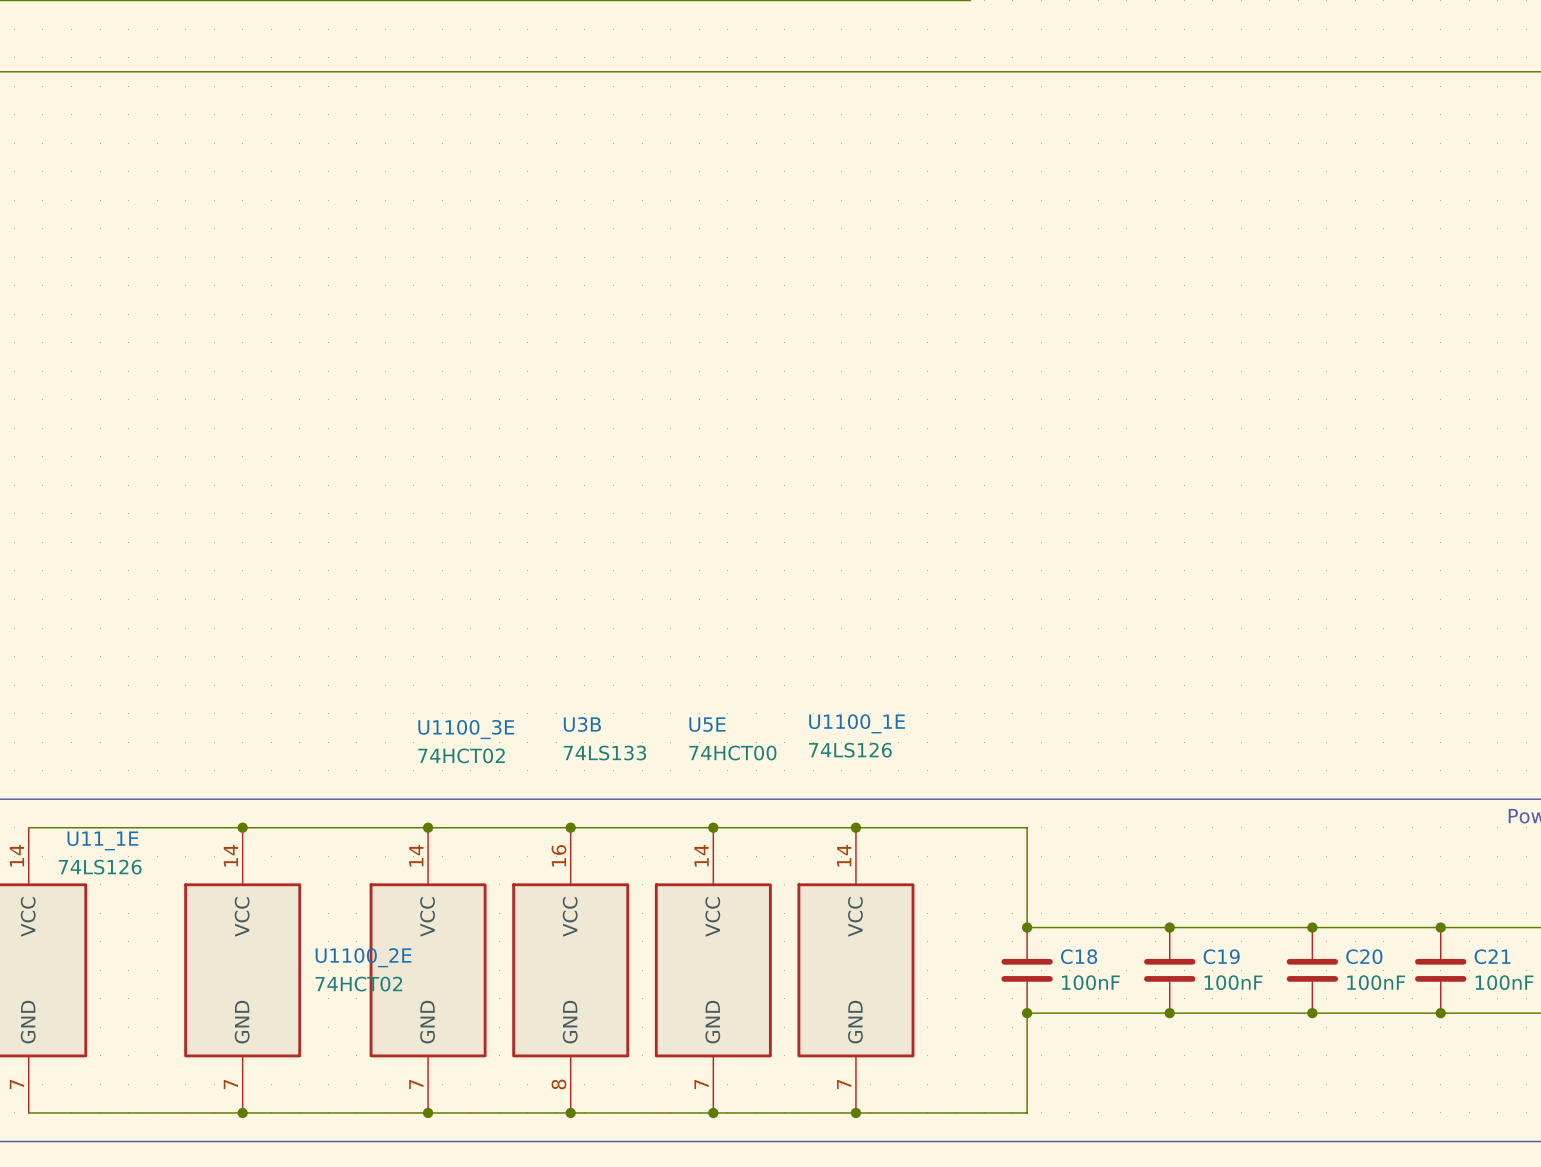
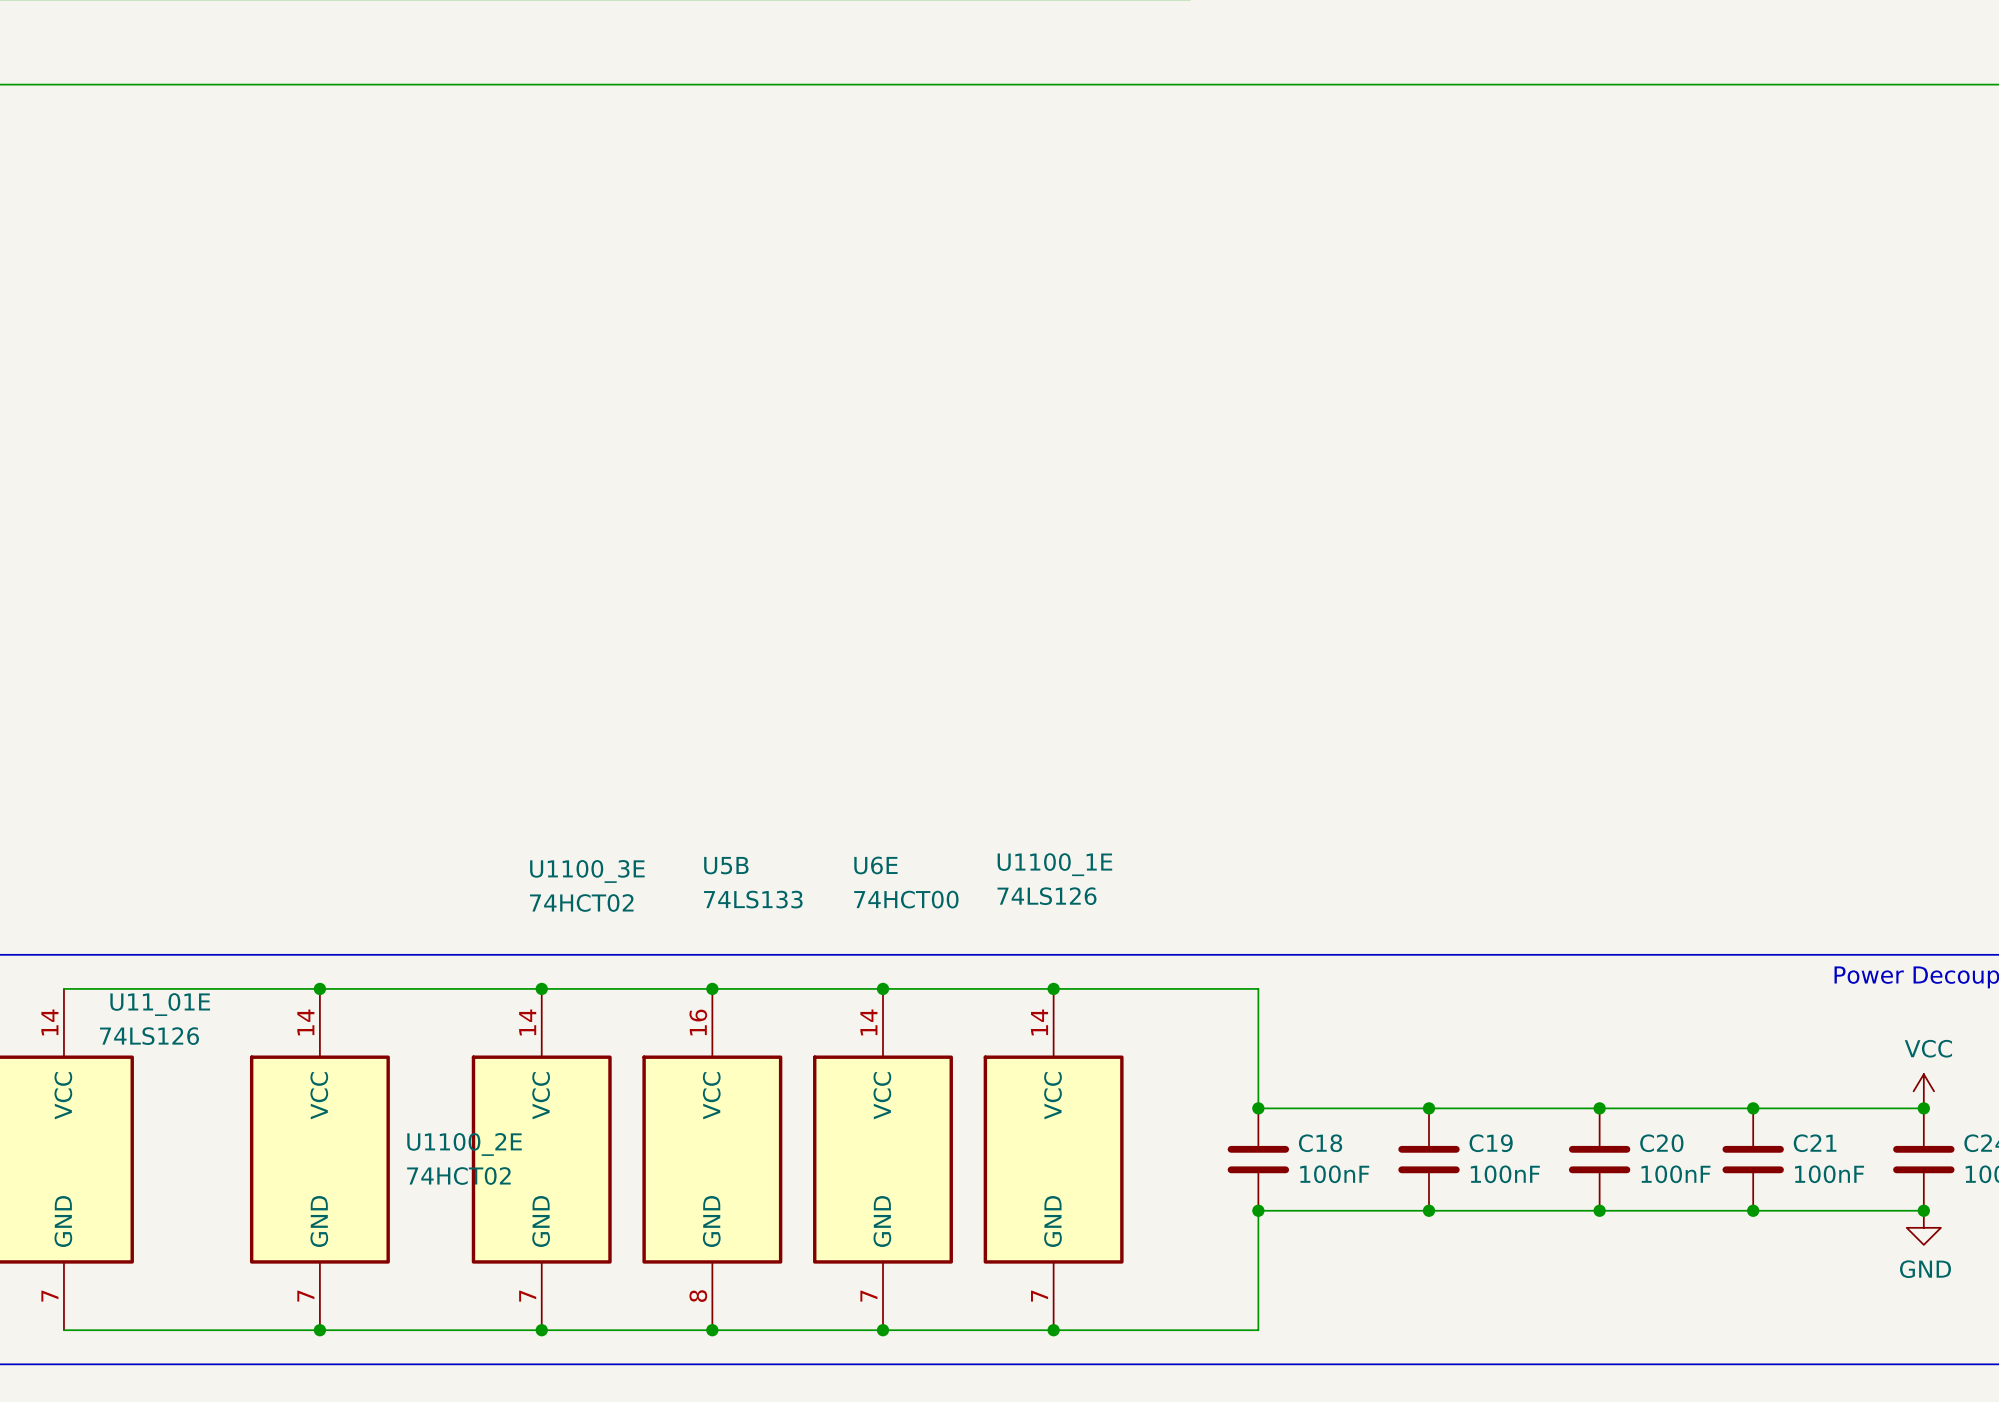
U3B name: U3B (582, 724) -> U5B (726, 865)
U5E name: U5E (707, 724) -> U6E (875, 865)
U11_1E name: U11_1E (102, 840) -> U11_01E (160, 1004)

